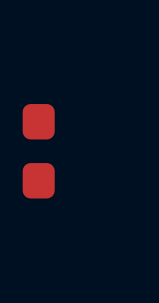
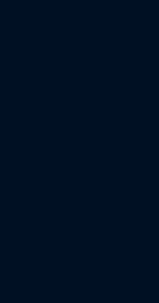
part: (38, 151) -> none

